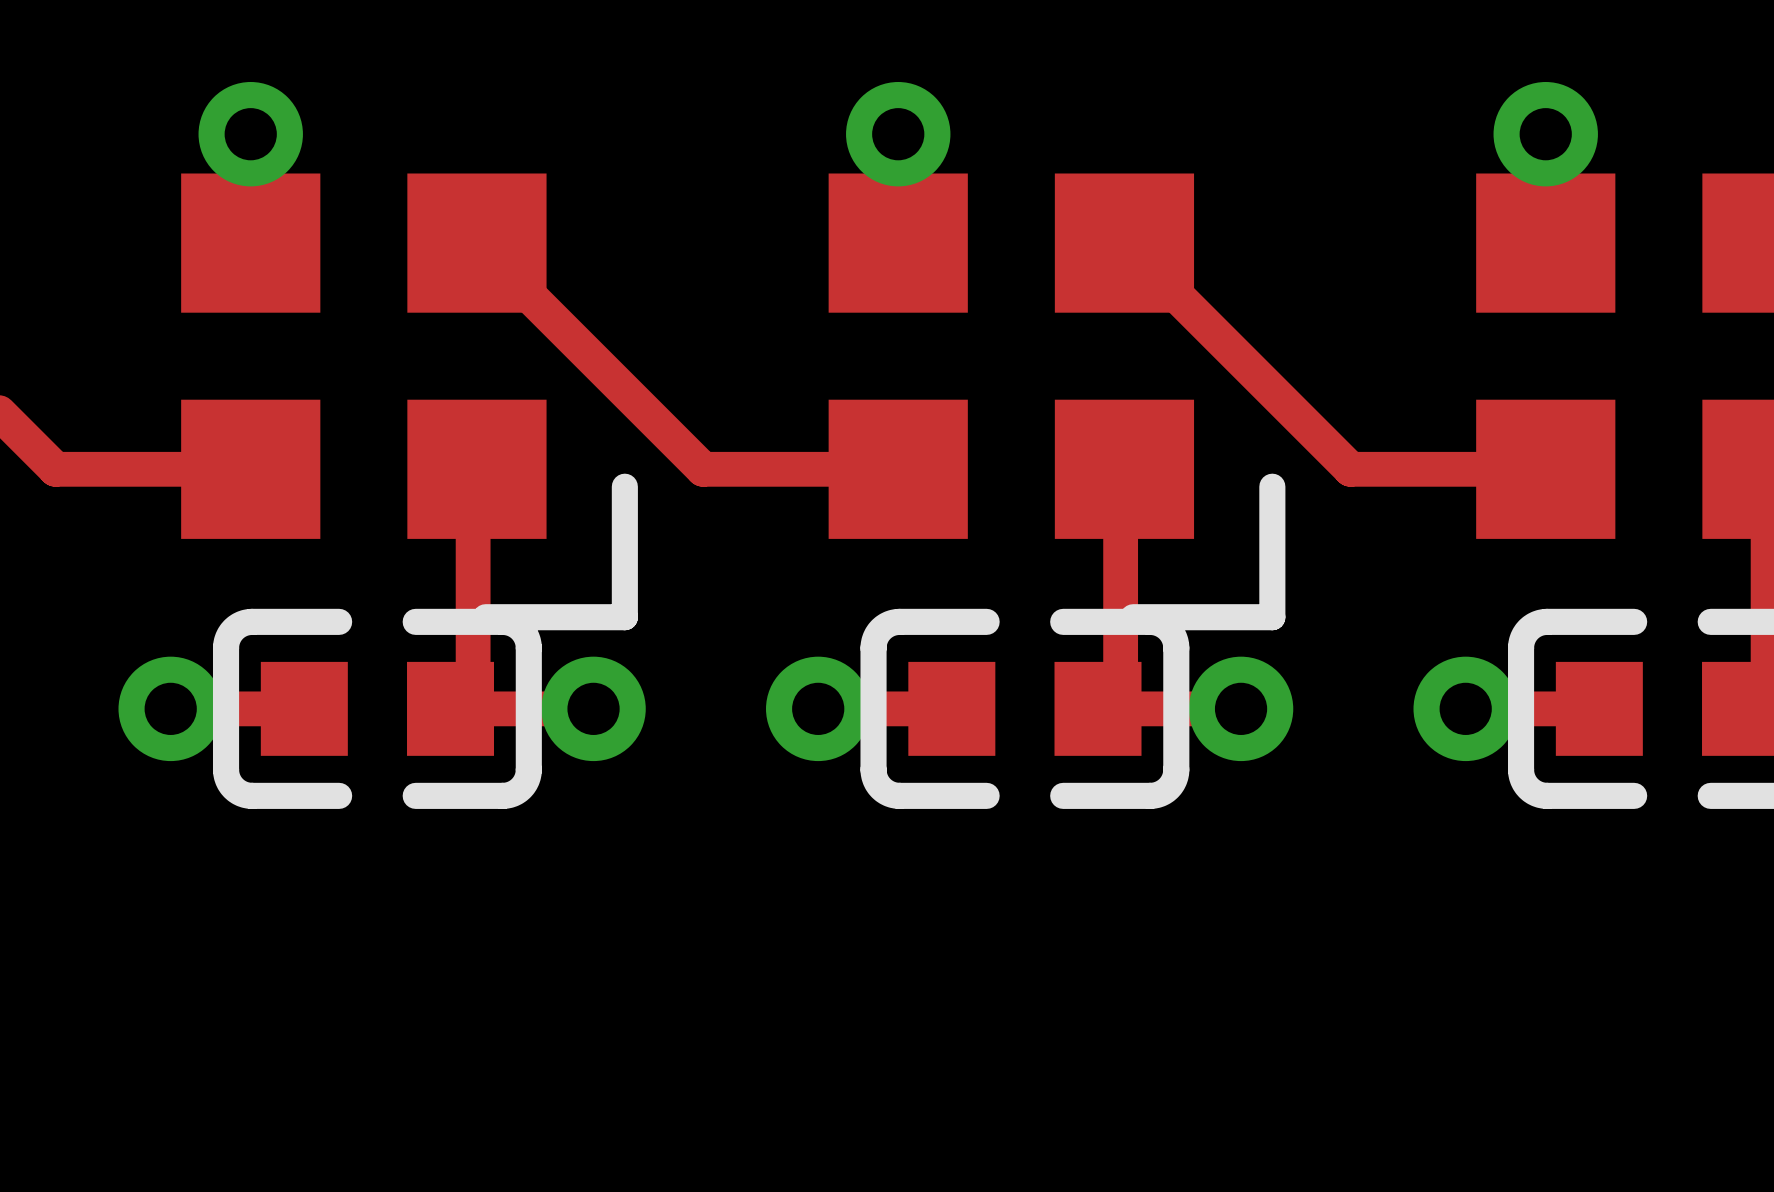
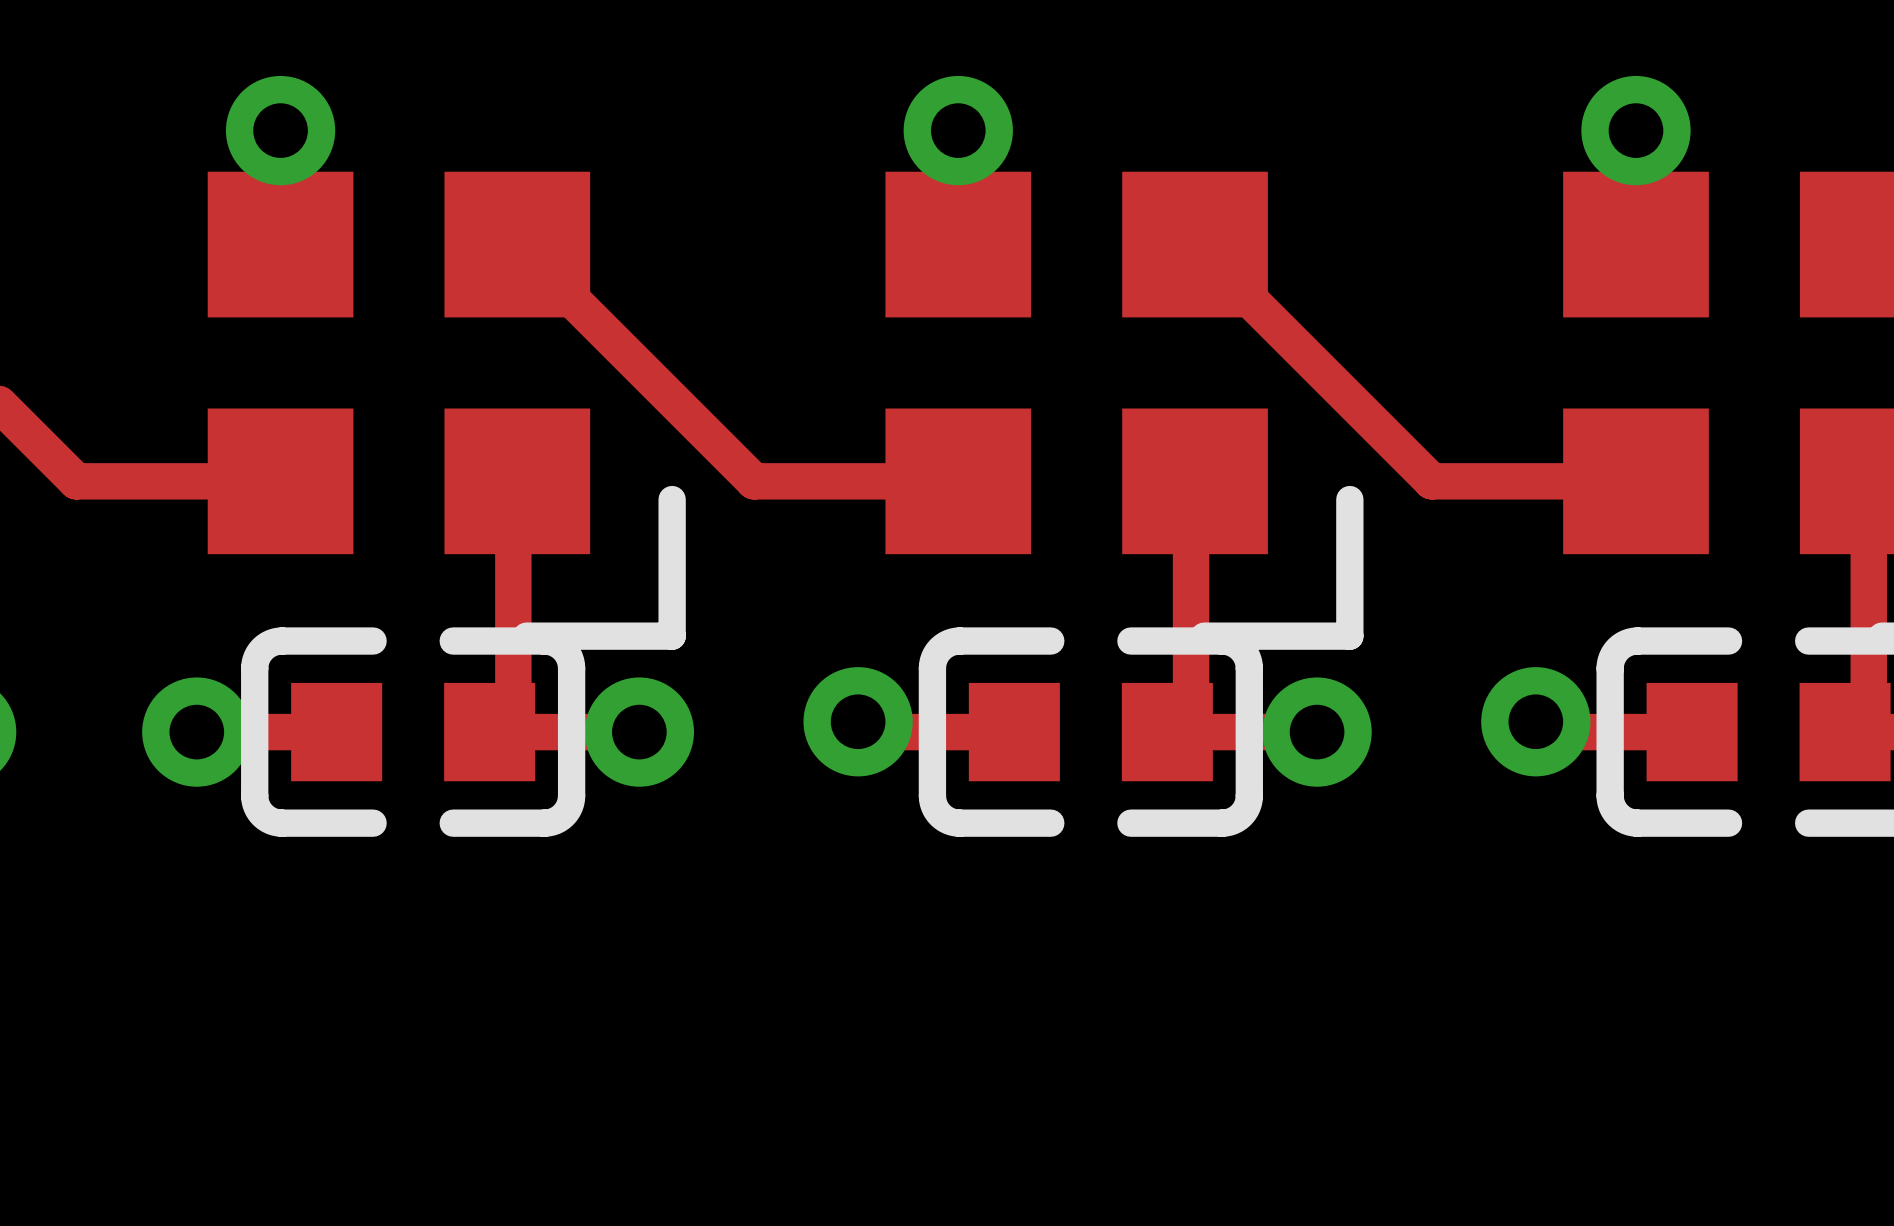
via position: (818, 708) -> (858, 721)
via position: (1465, 708) -> (1535, 721)

